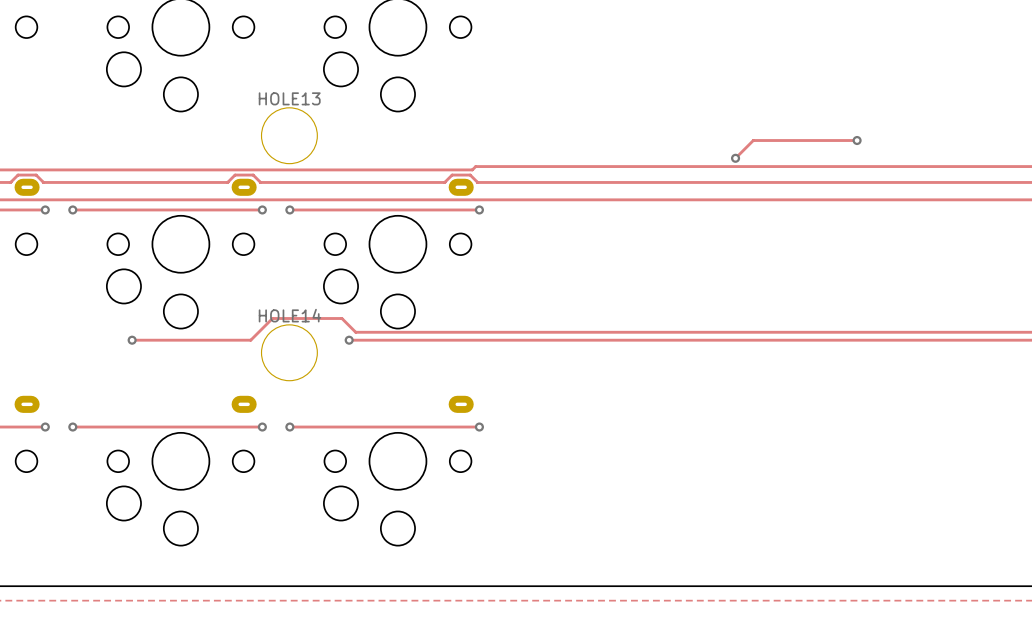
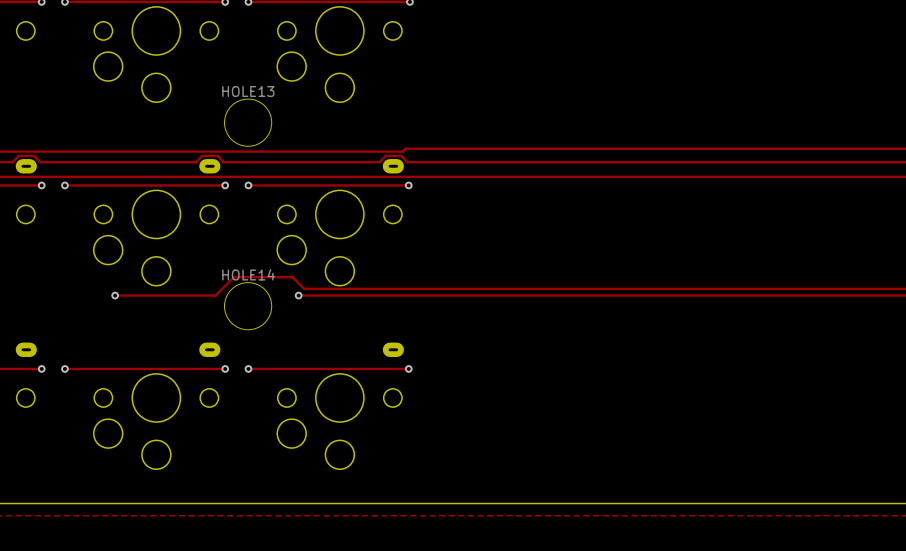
track: (857, 140) (753, 140) (735, 158) -> none
via: (857, 140) -> none
via: (735, 158) -> none

